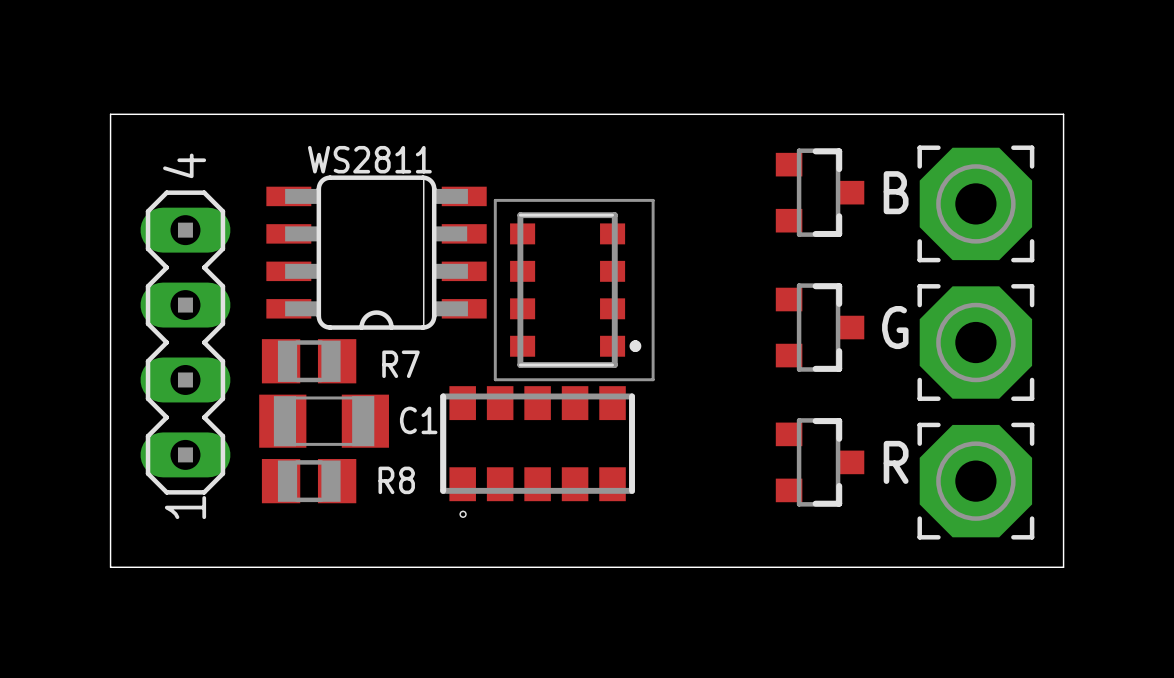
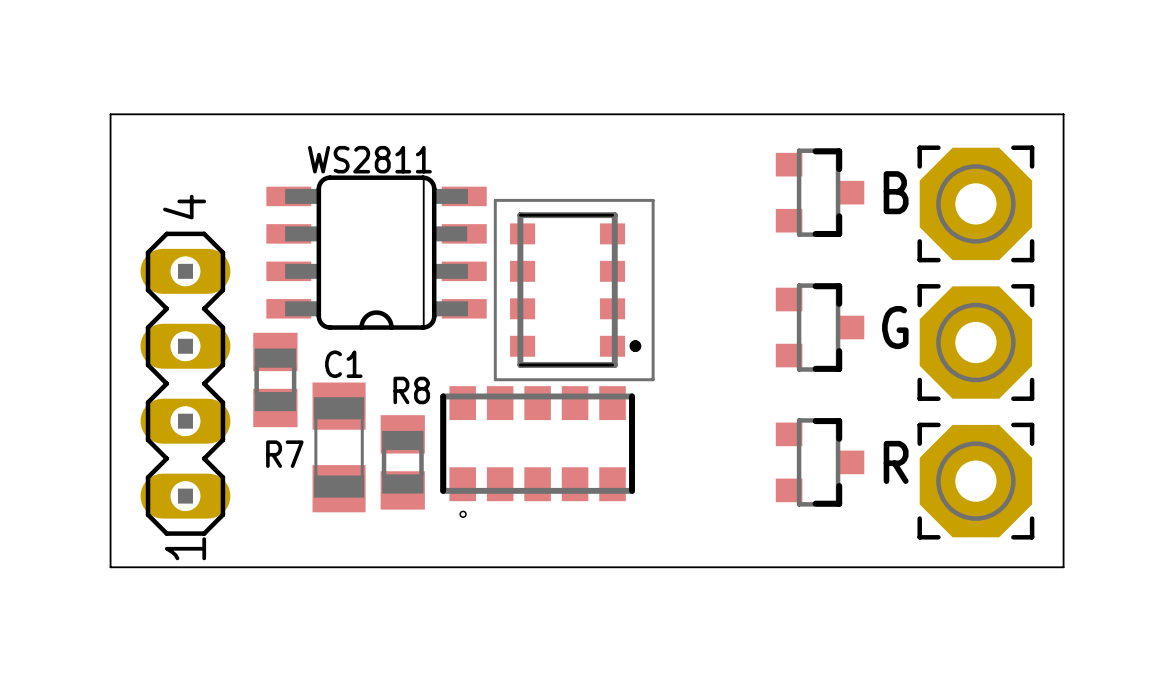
part position: (185, 342) -> (185, 383)
part rotation: 0° (309, 361) -> 90° clockwise (275, 379)
text position: R7 (400, 364) -> R7 (284, 454)
text position: C1 (418, 420) -> C1 (343, 364)
part rotation: 0° (324, 421) -> 90° clockwise (339, 447)
part: none -> (402, 462)
text position: R8 (396, 480) -> R8 (411, 390)
part: (309, 481) -> none

